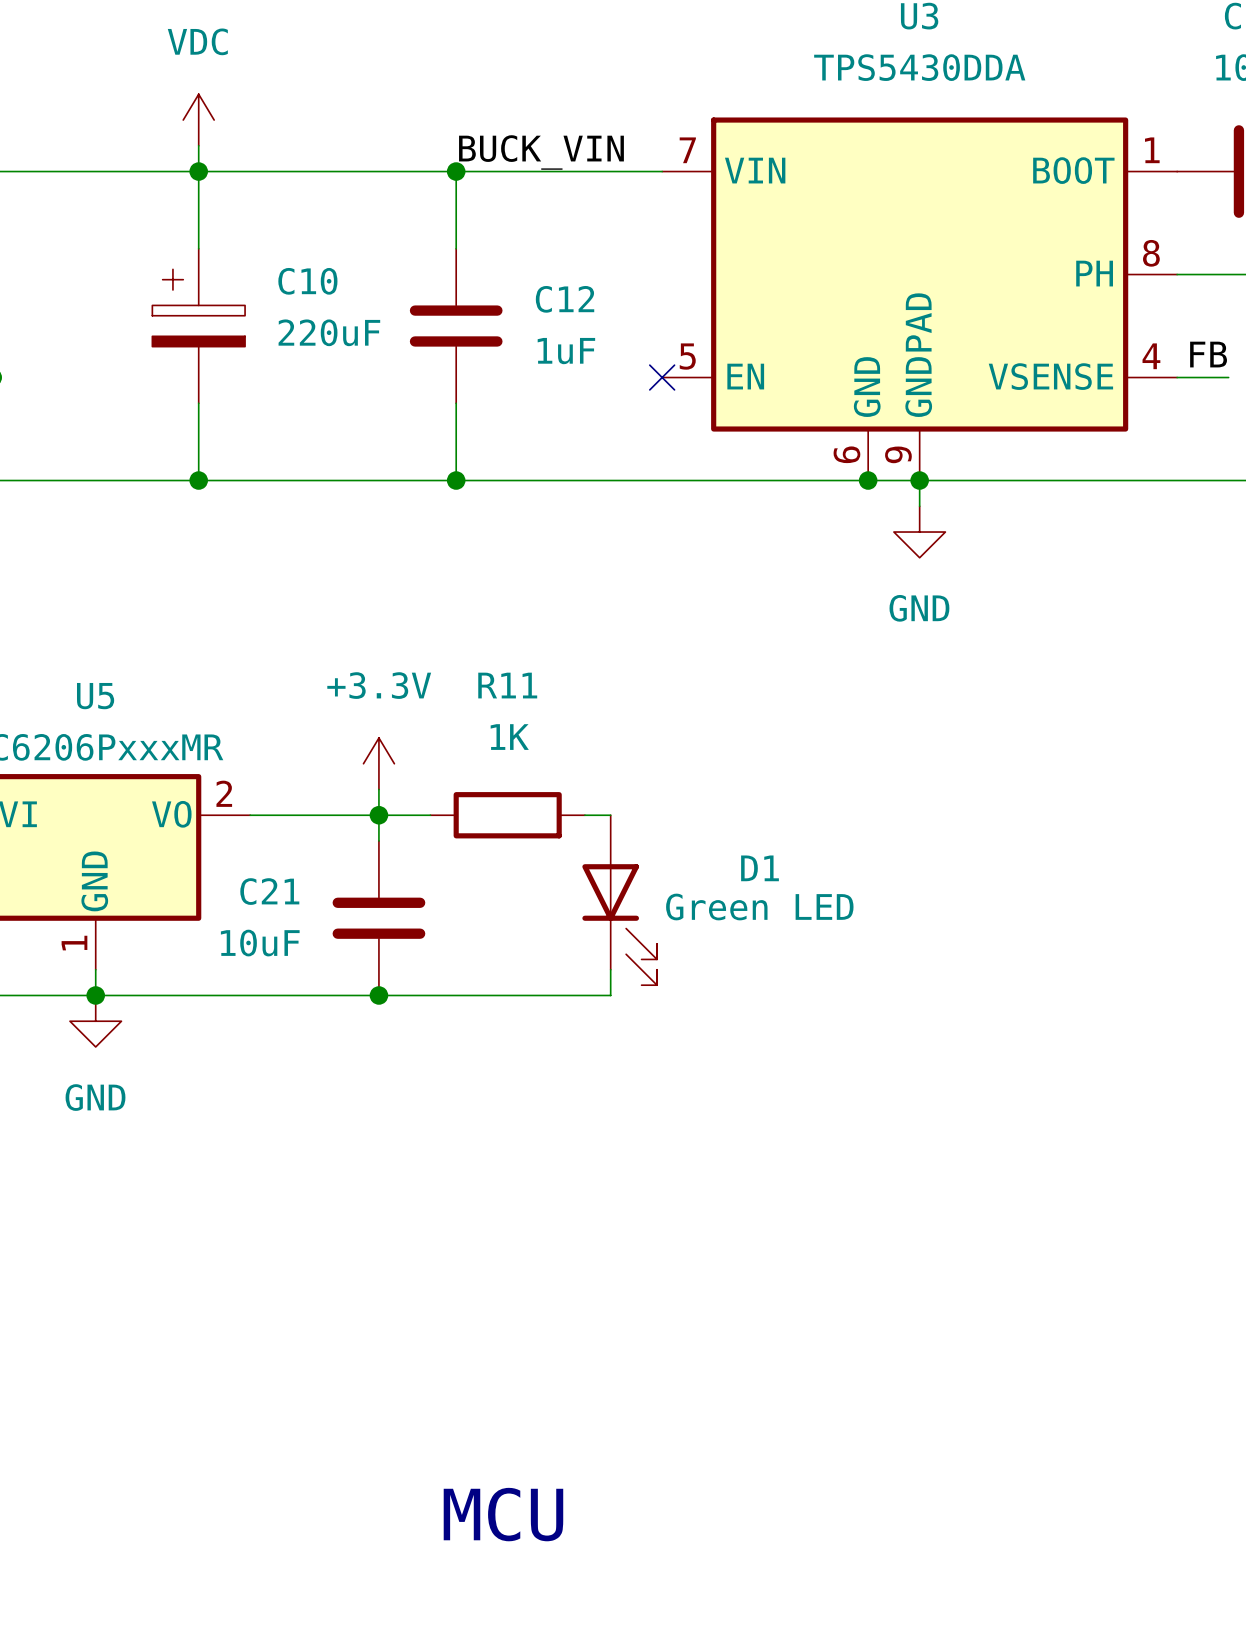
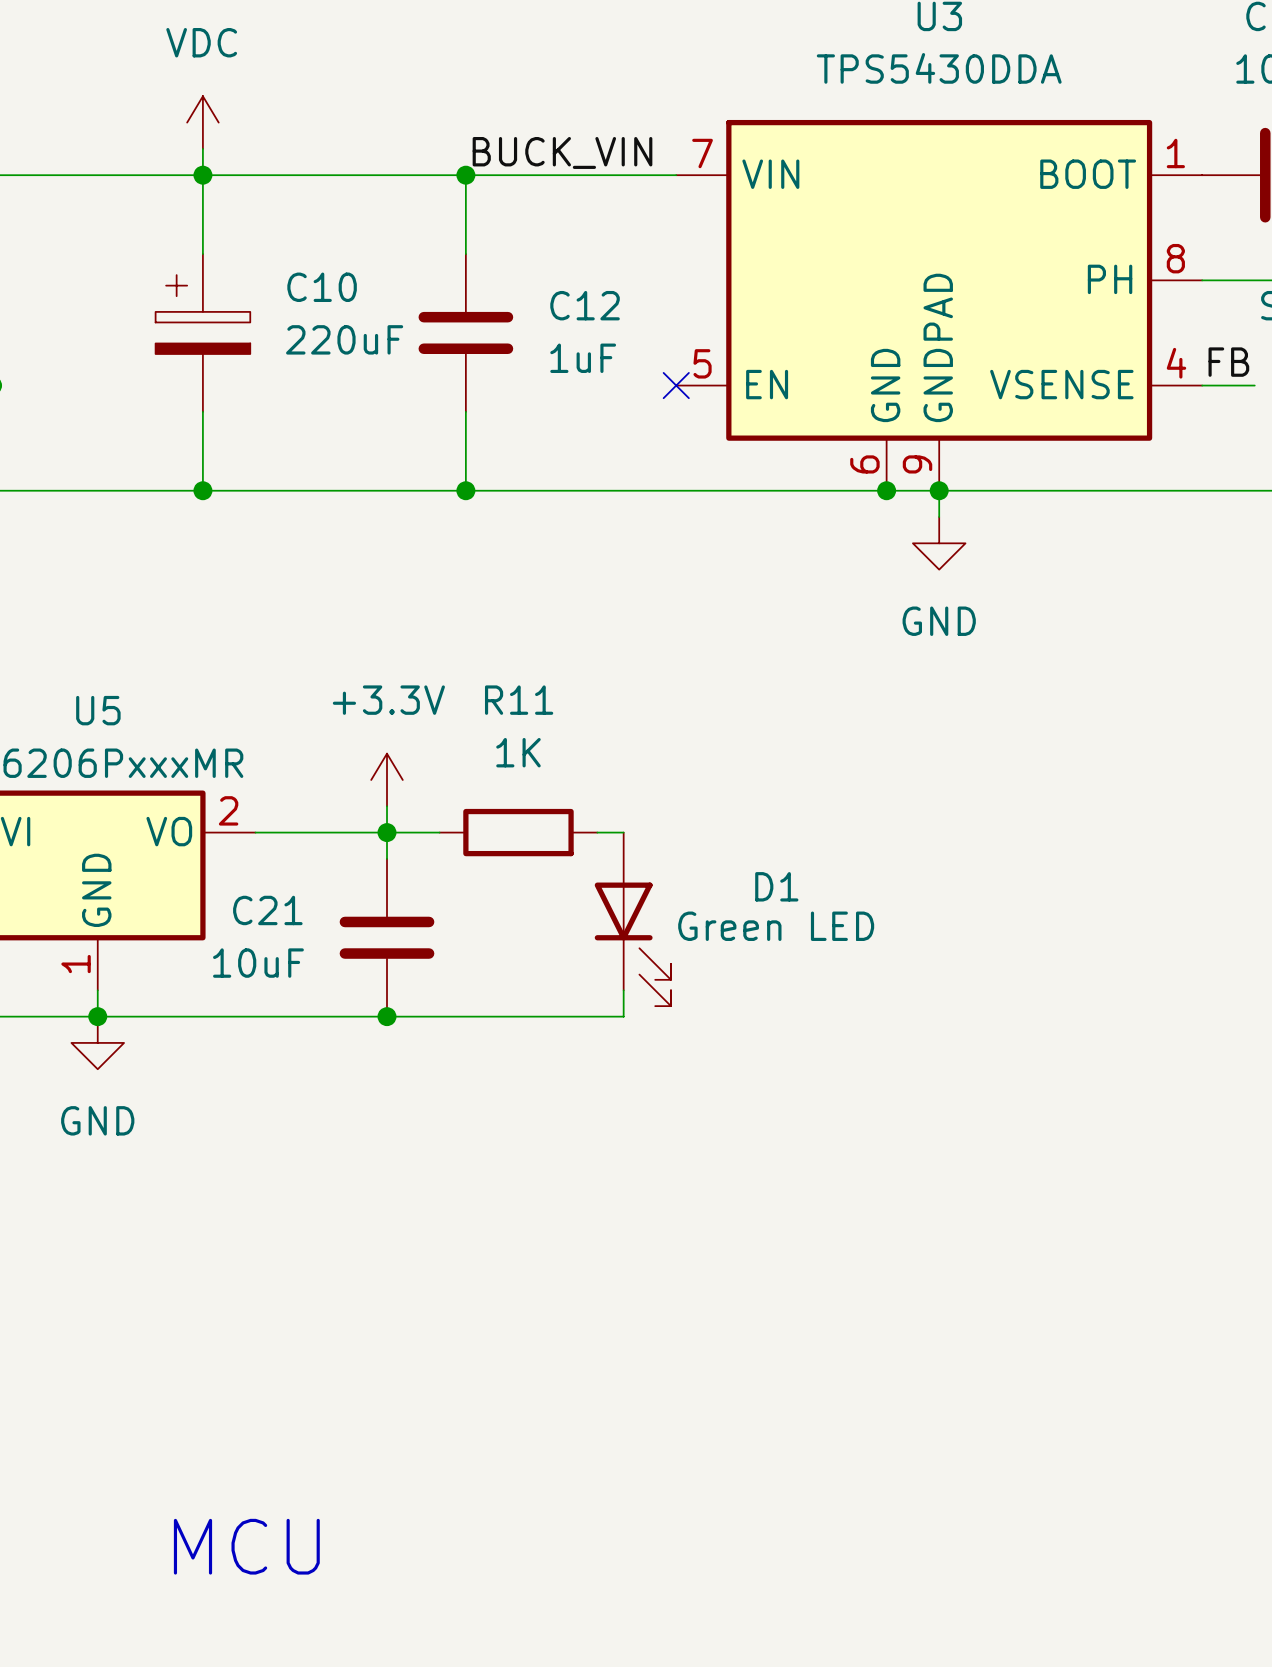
text position: MCU (503, 1514) -> MCU (246, 1546)

